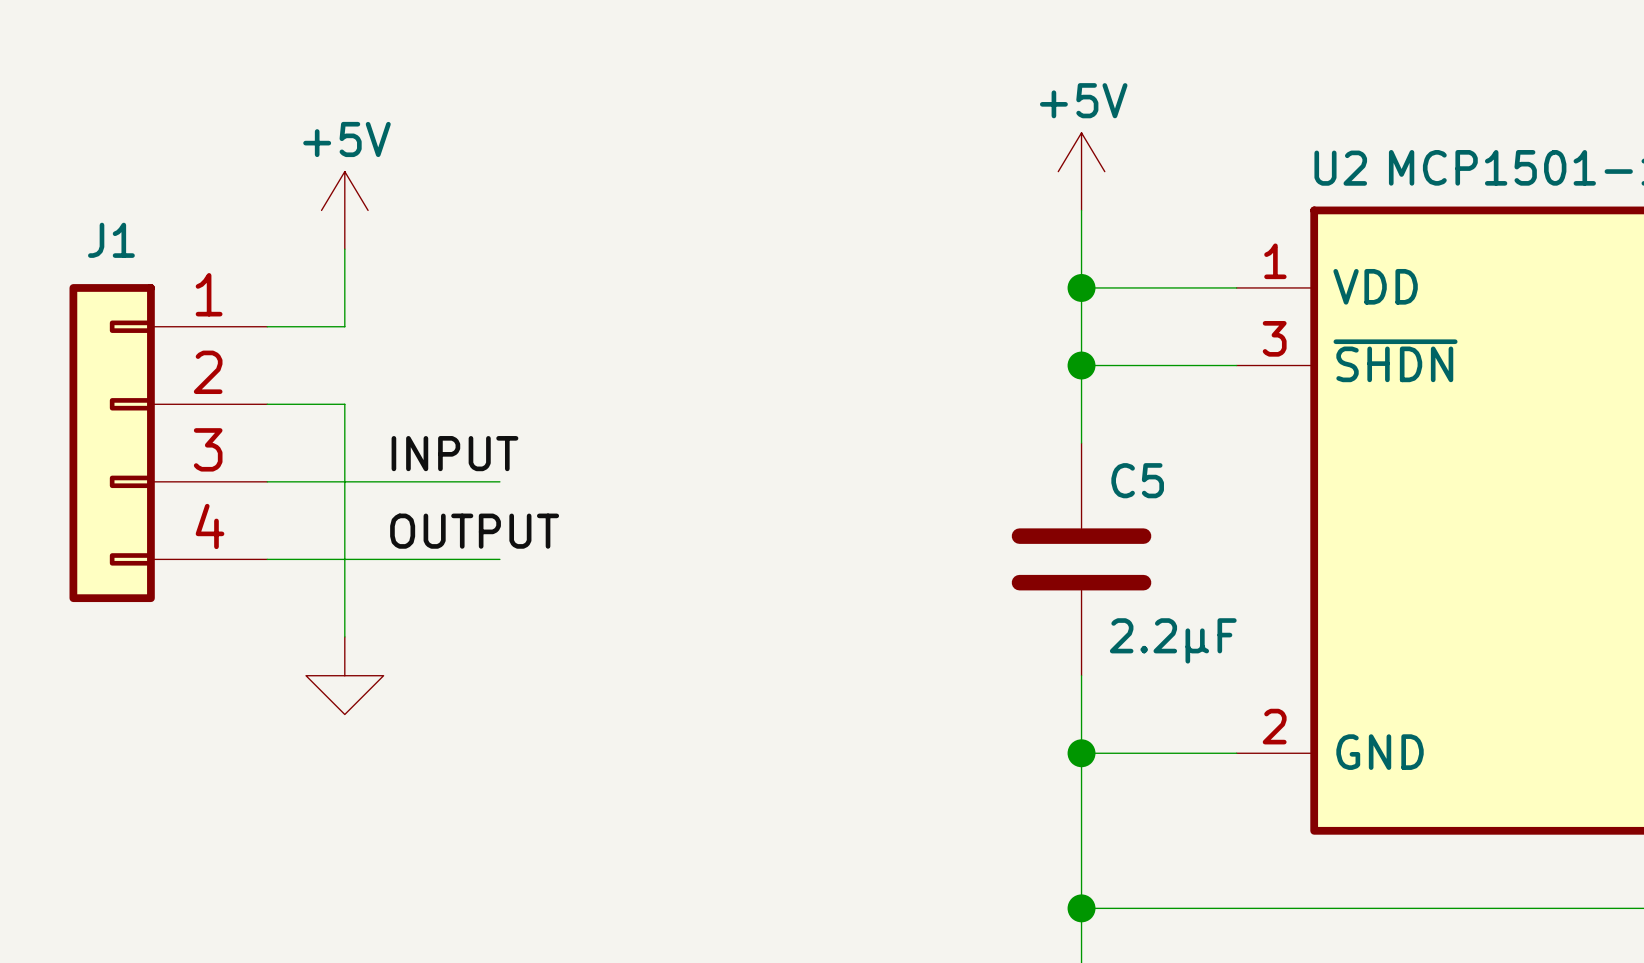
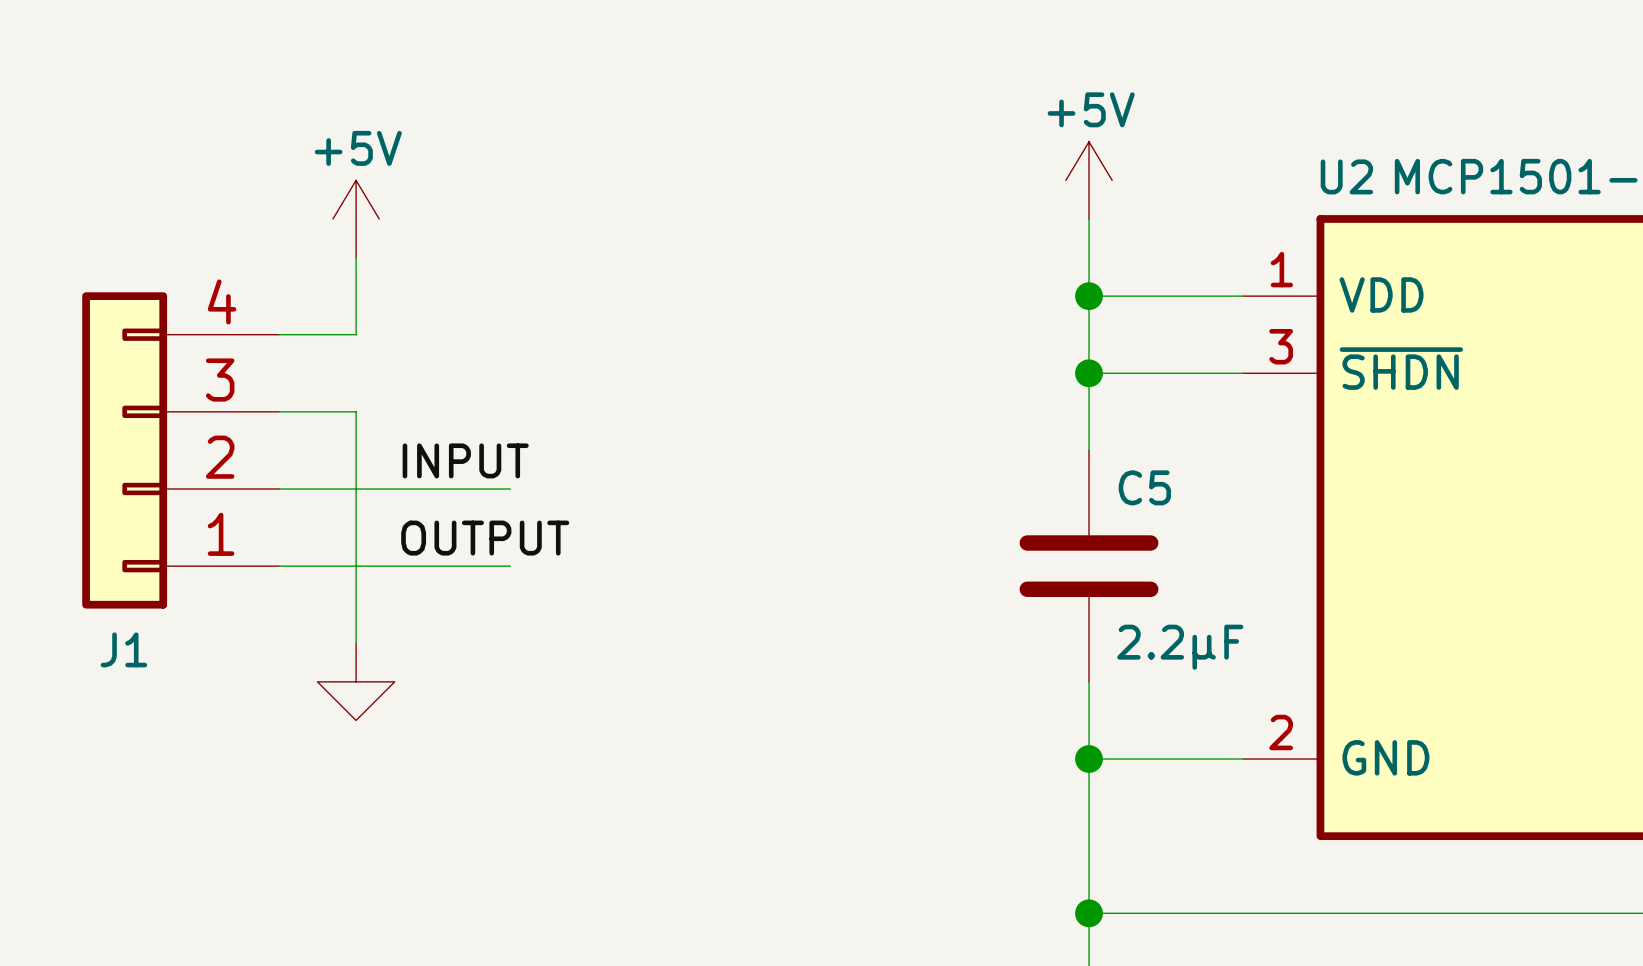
J1 flip: as is (112, 443) -> up-down (124, 450)

